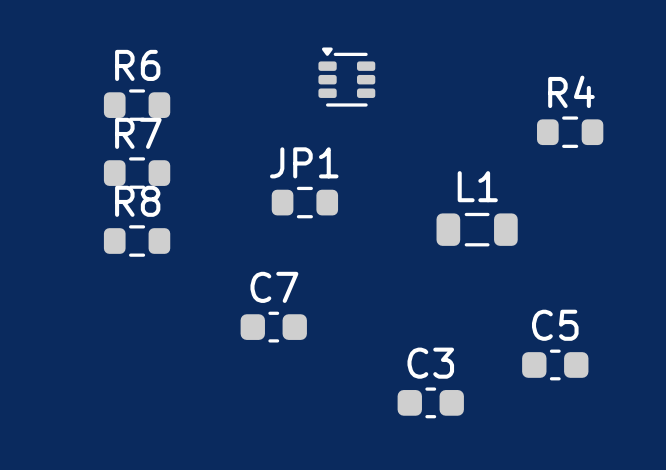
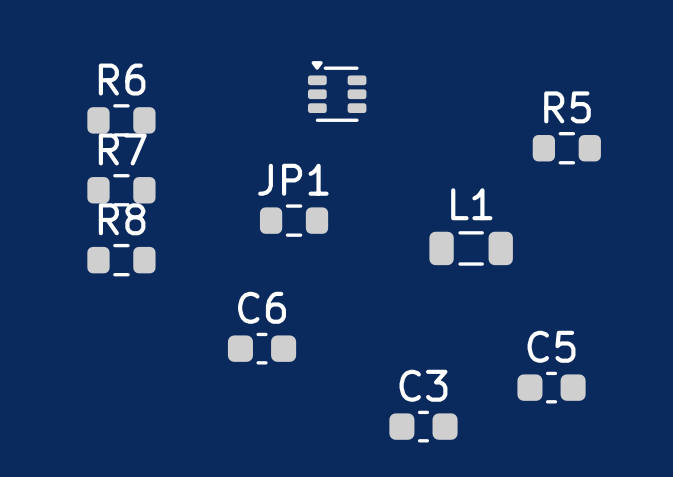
R4 name: R4 (571, 91) -> R5 (567, 107)
C7 name: C7 (274, 287) -> C6 (262, 307)

